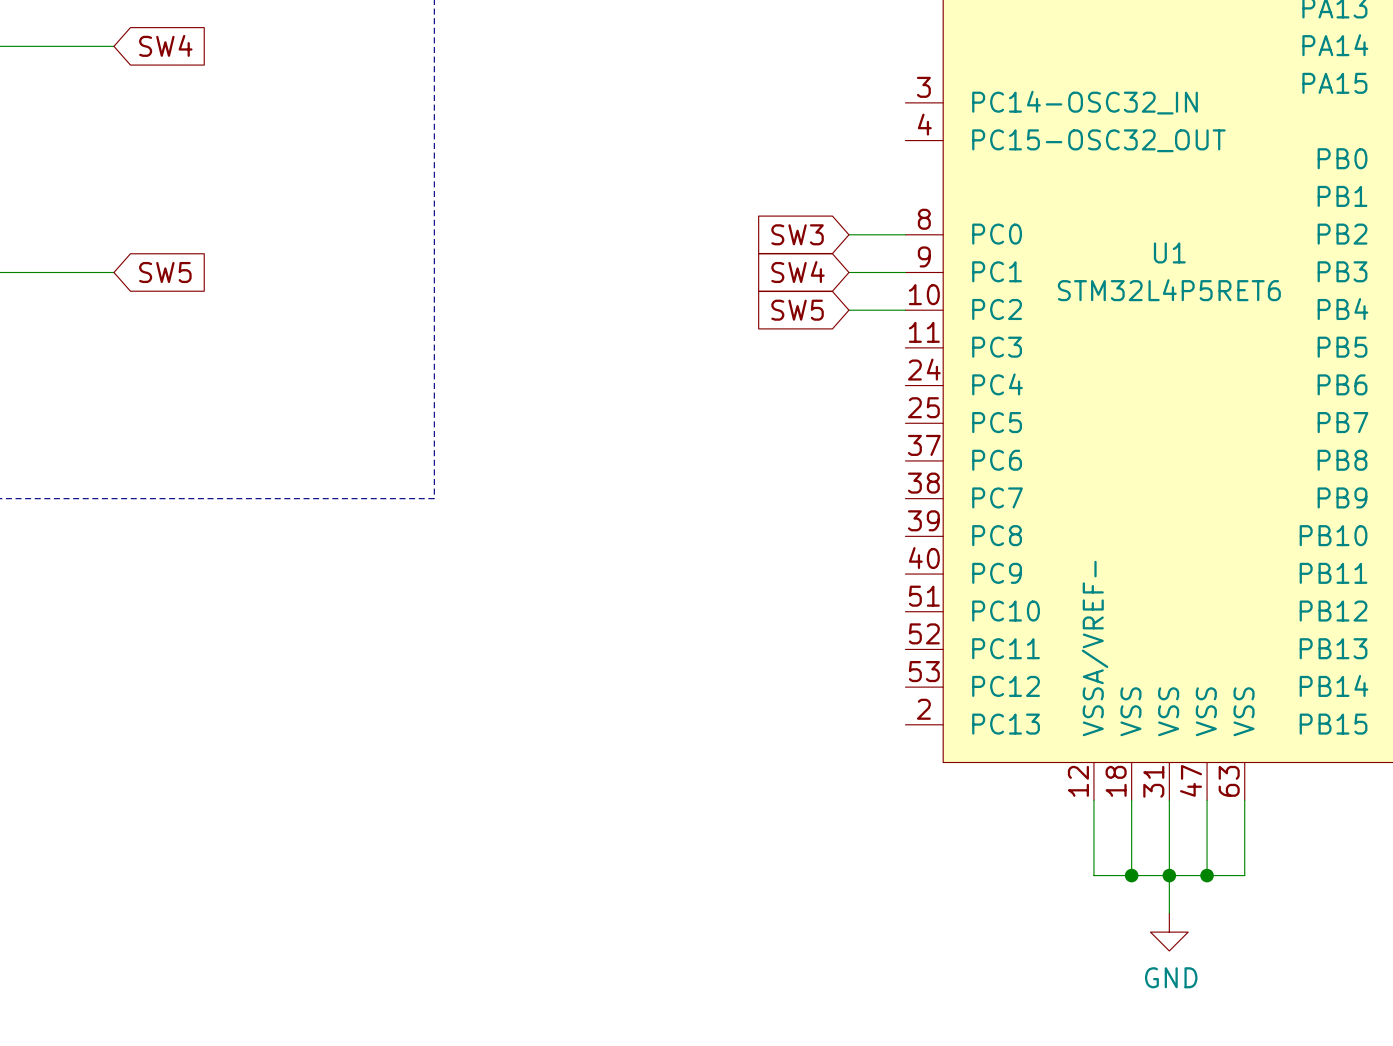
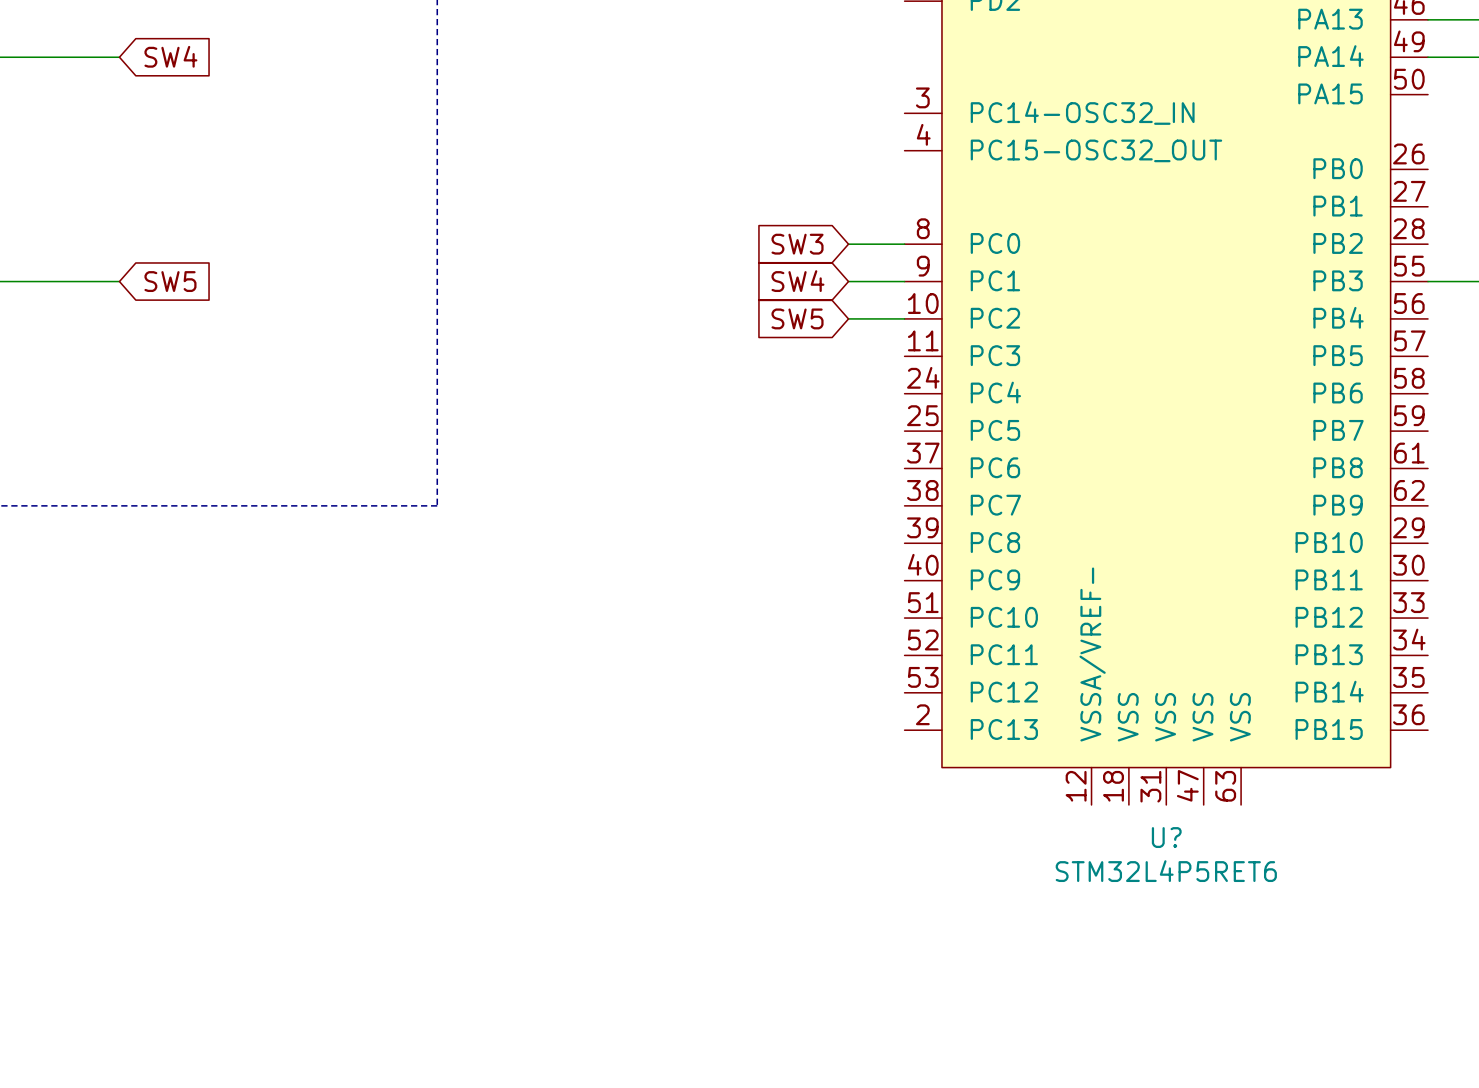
U1 name: U1 (1169, 252) -> U? (1166, 837)
U1 value position: STM32L4P5RET6 (1169, 290) -> STM32L4P5RET6 (1166, 871)
wire: (1093, 800) (1093, 875) (1244, 875) (1244, 800) -> none
wire: (1131, 800) (1131, 875) -> none
wire: (1169, 800) (1169, 913) -> none
wire: (1207, 800) (1207, 875) -> none
junction: (1131, 875) -> none
junction: (1169, 875) -> none
junction: (1207, 875) -> none
power symbol: GND (1169, 932) -> none

